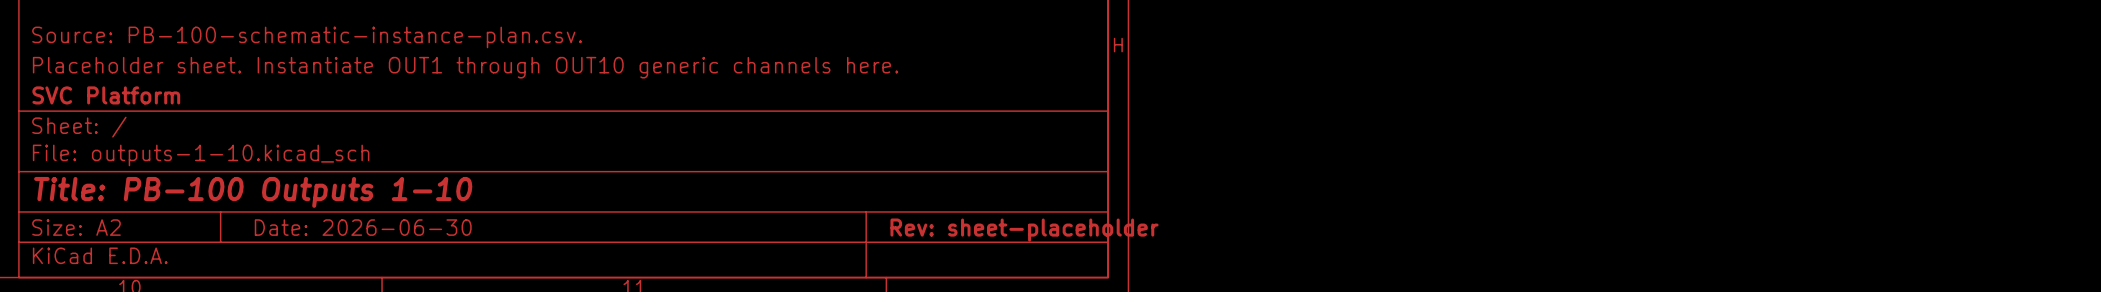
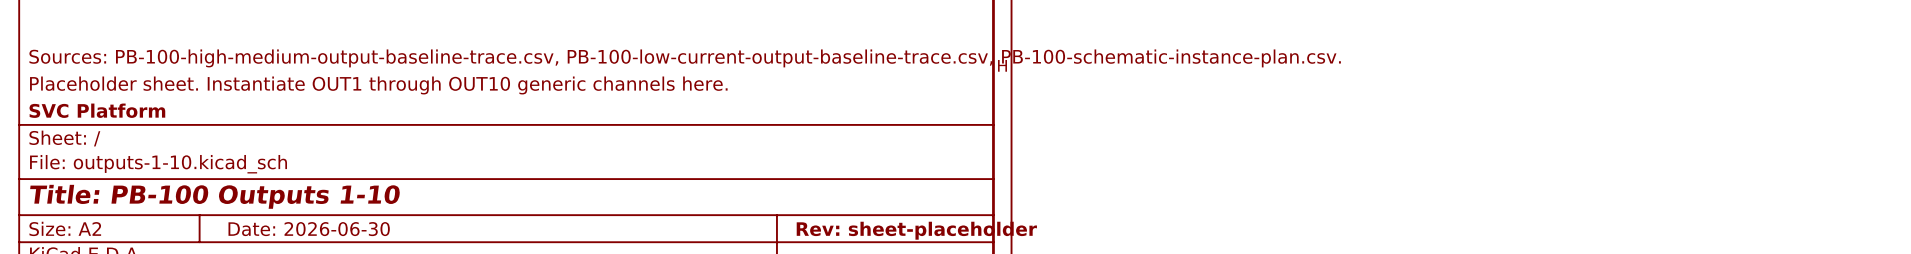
title block: Source: PB-100-schematic-instance-plan.csv. (307, 37) -> Sources: PB-100-high-medium-output-baseline-trace.csv, PB-100-low-current-output-baseline-trace.csv, PB-100-schematic-instance-plan.csv. (685, 58)

